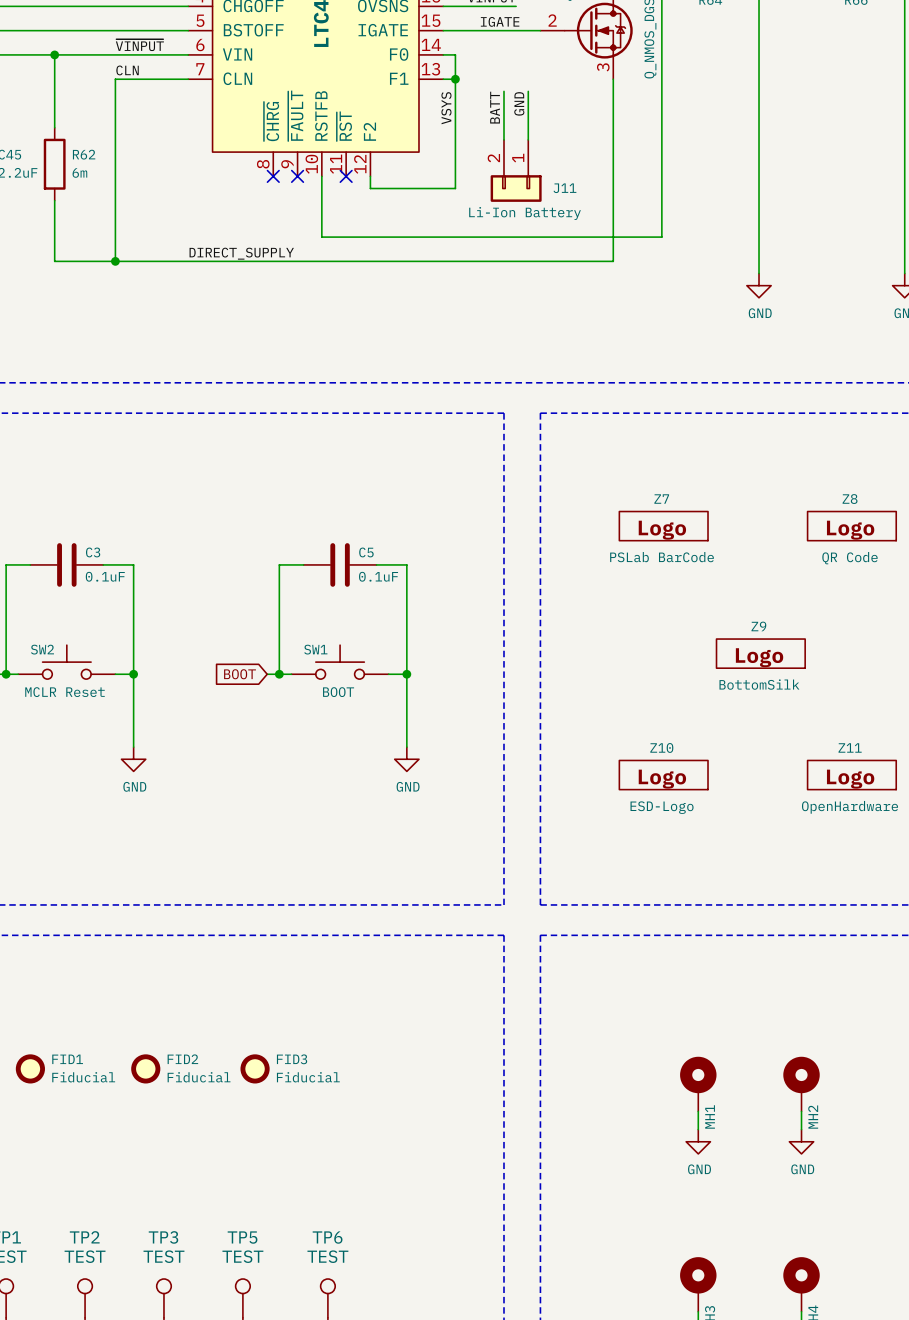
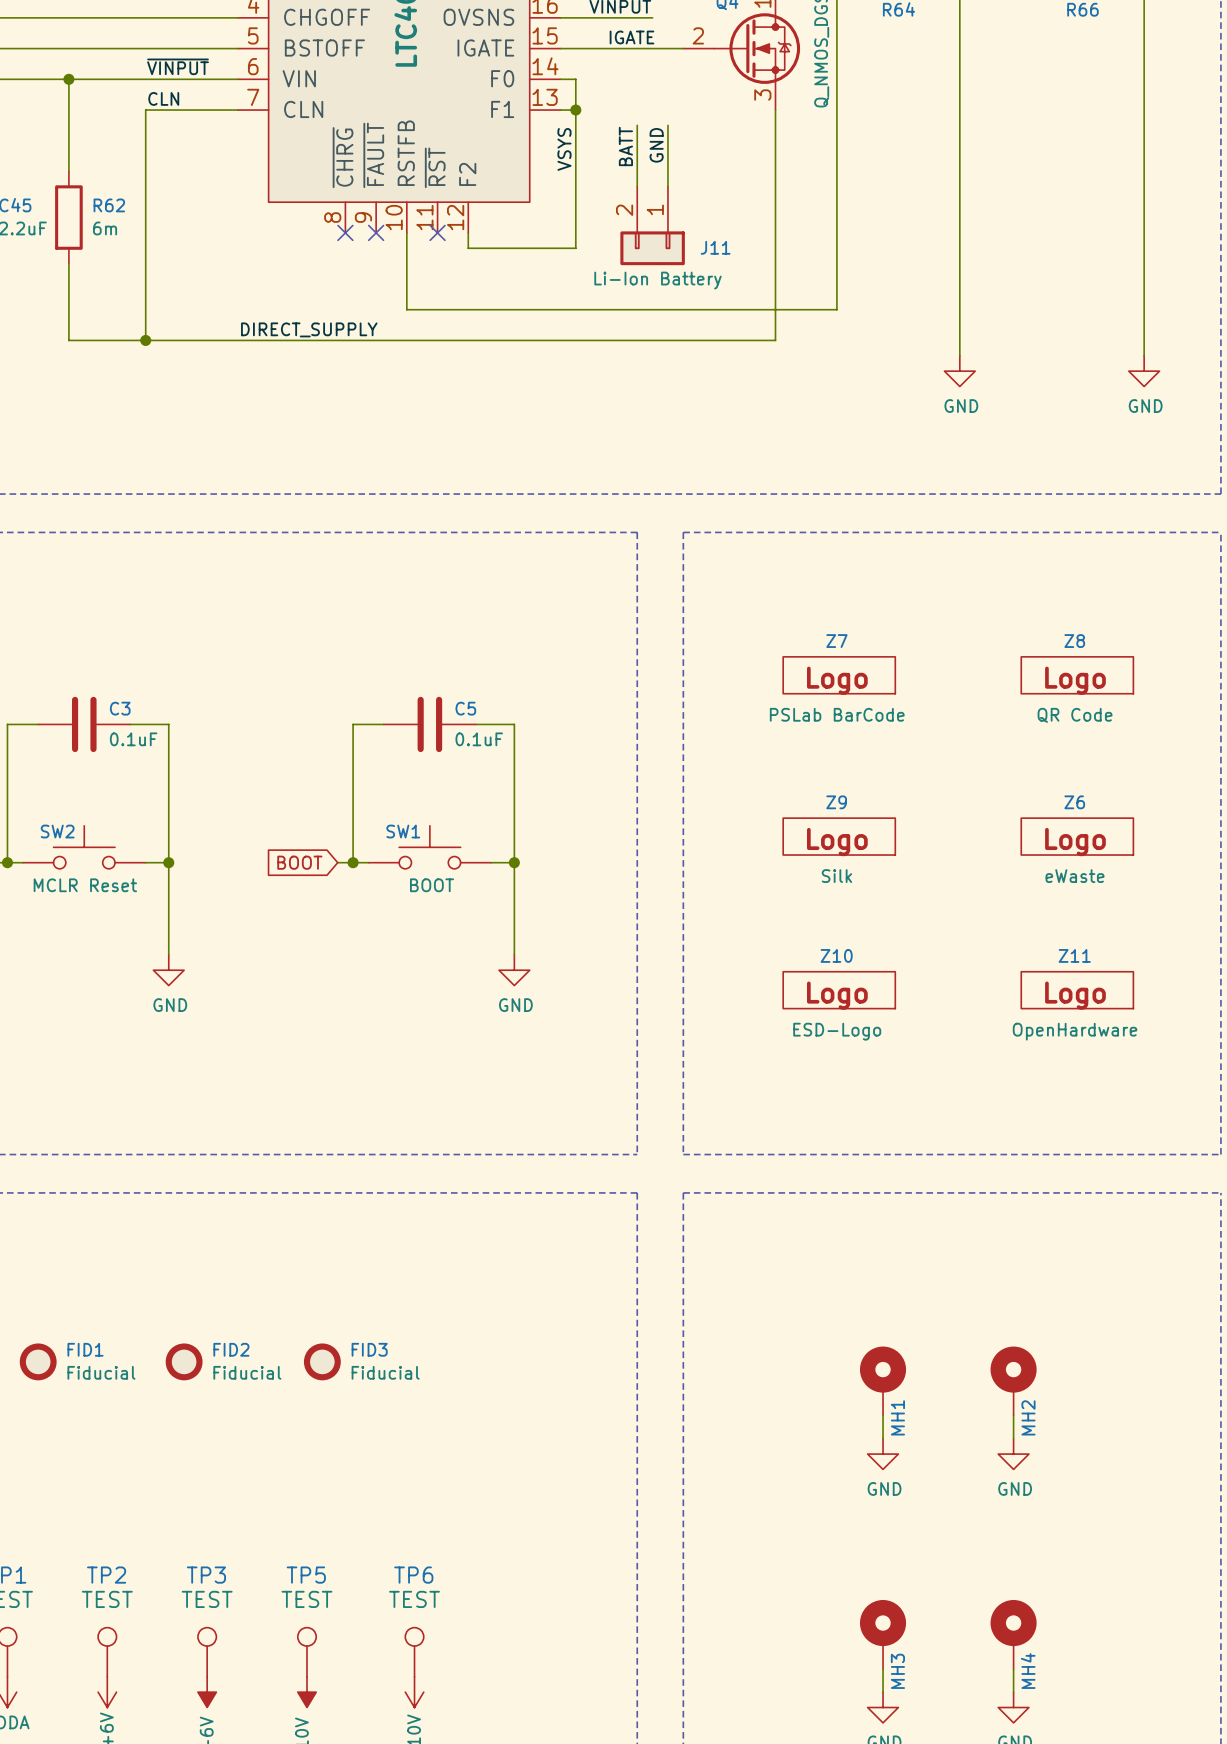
Z9 position: (760, 653) -> (839, 836)
Z6: none -> eWaste (1077, 836)
Z9 value: BottomSilk (759, 684) -> Silk (836, 876)

